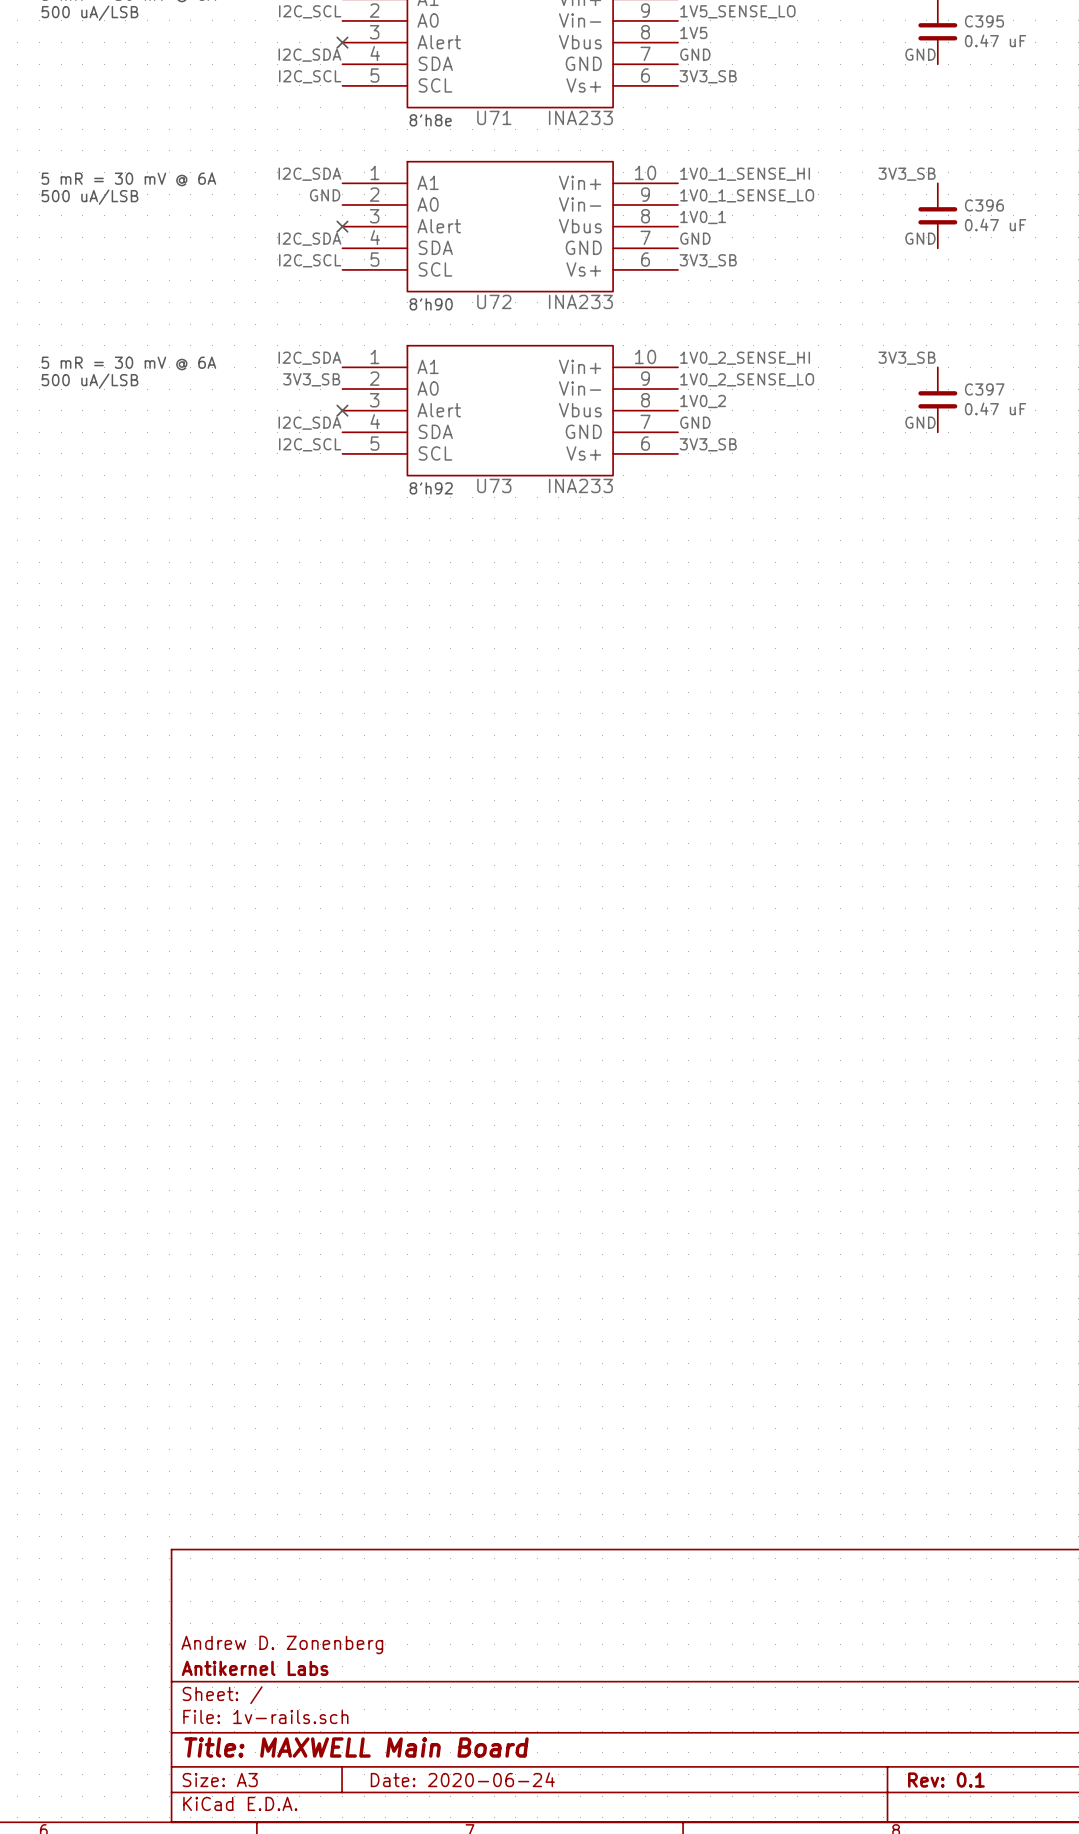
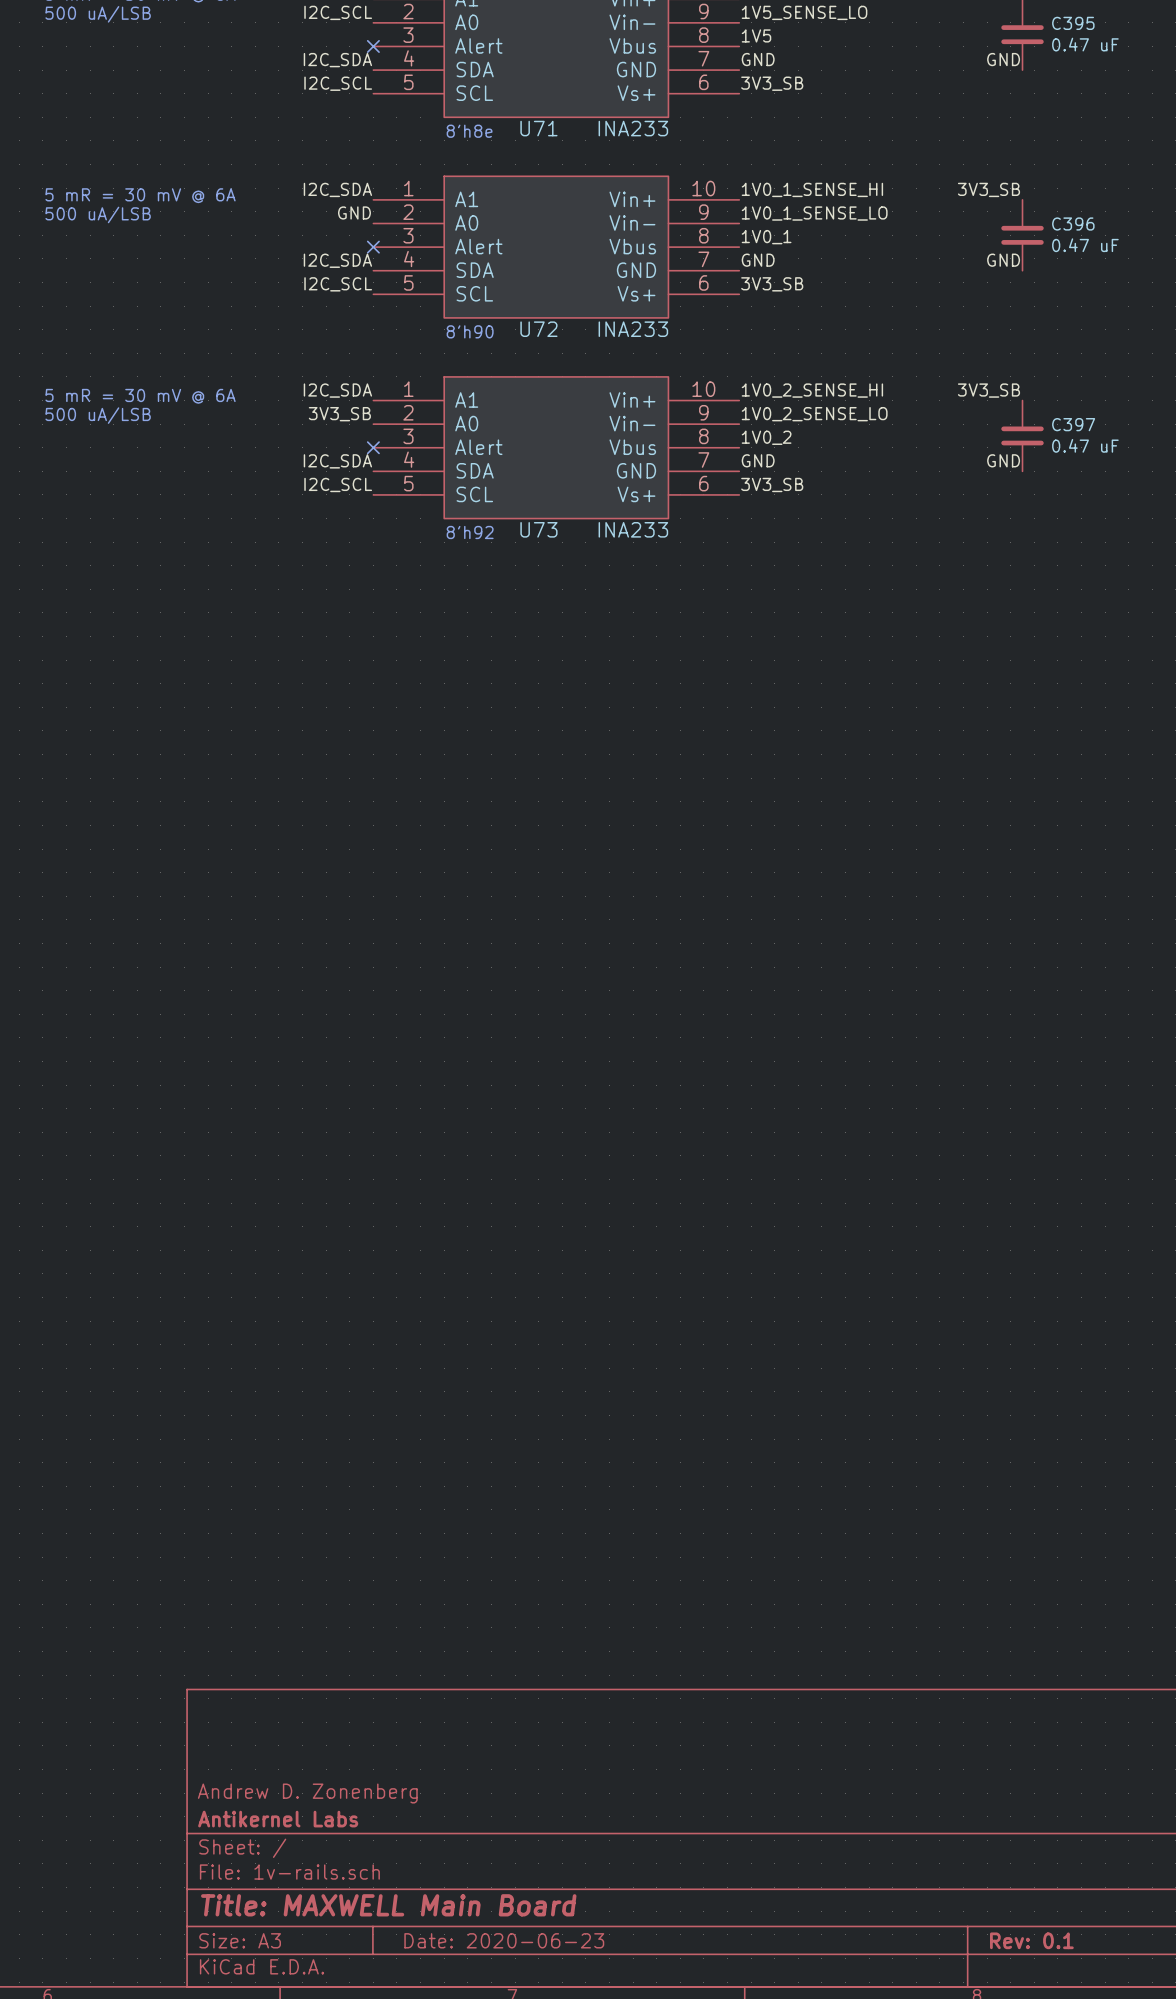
title block: Date: 2020-06-24 (462, 1779) -> Date: 2020-06-23 (504, 1940)

